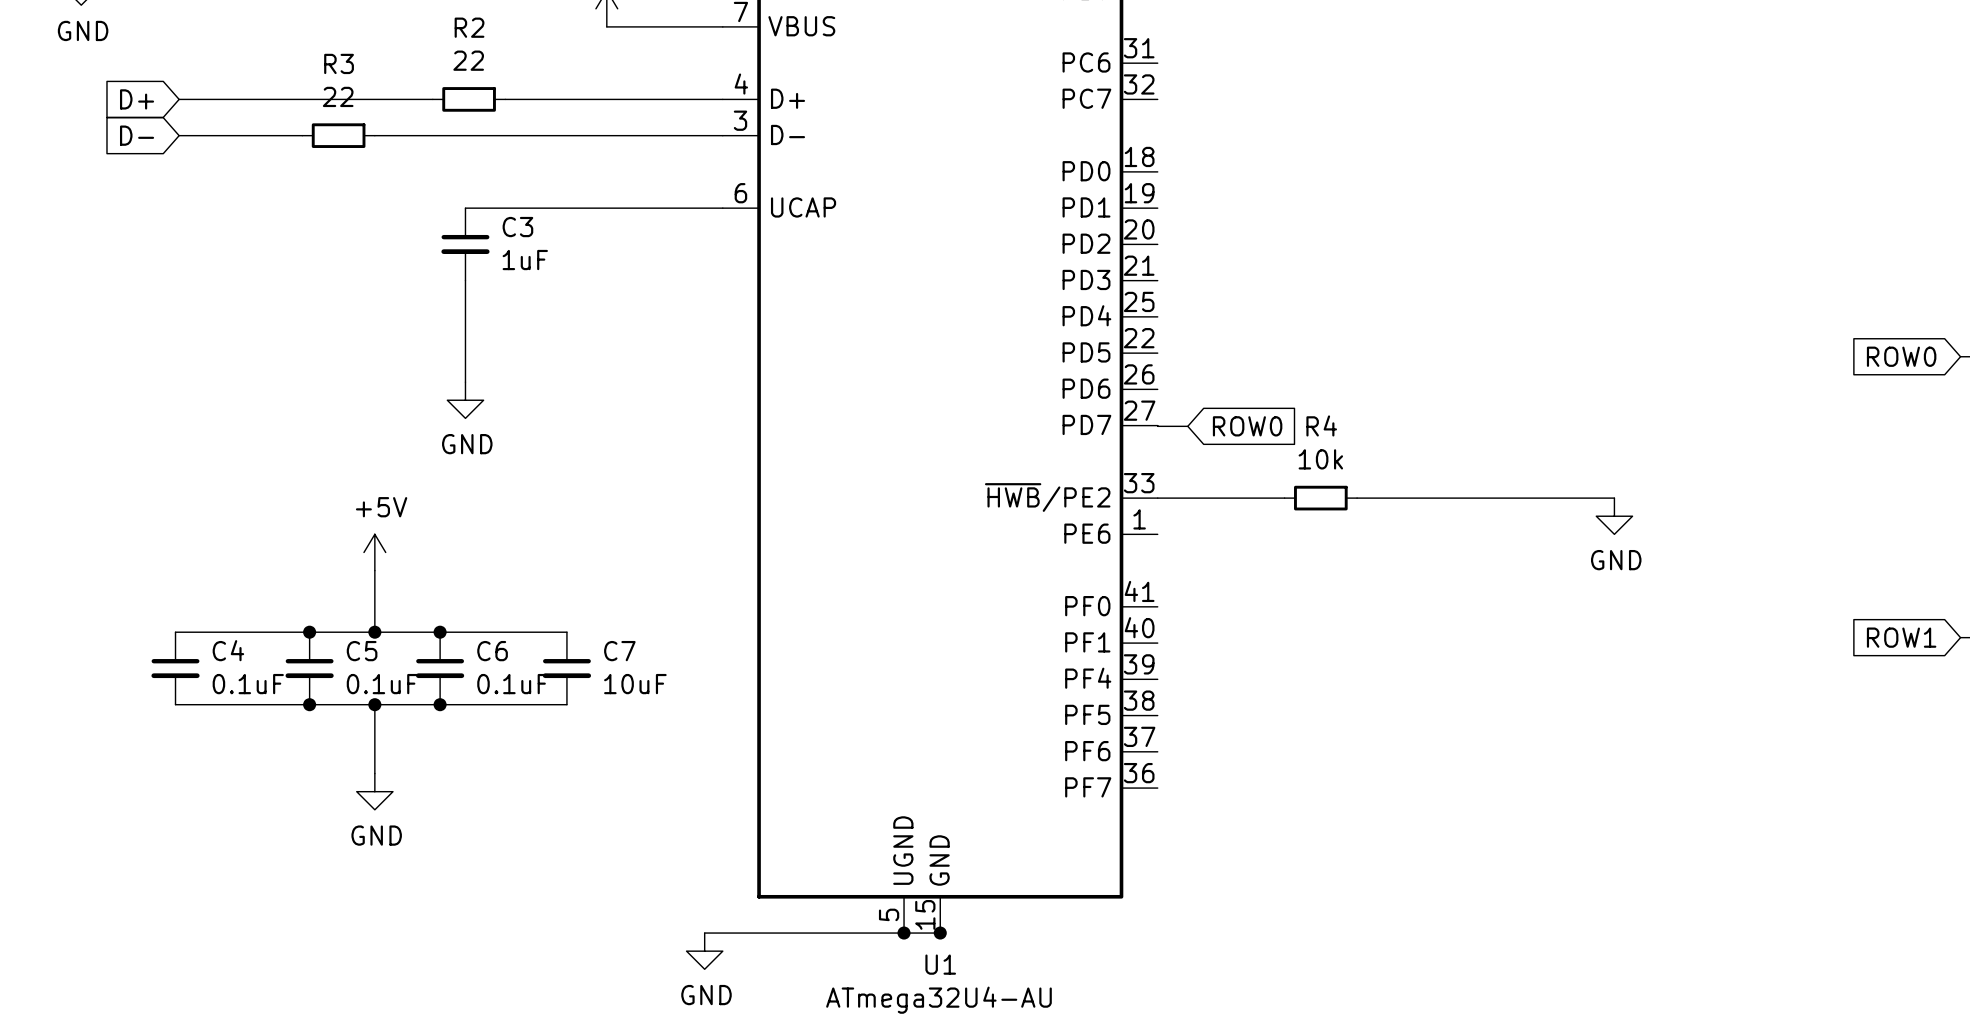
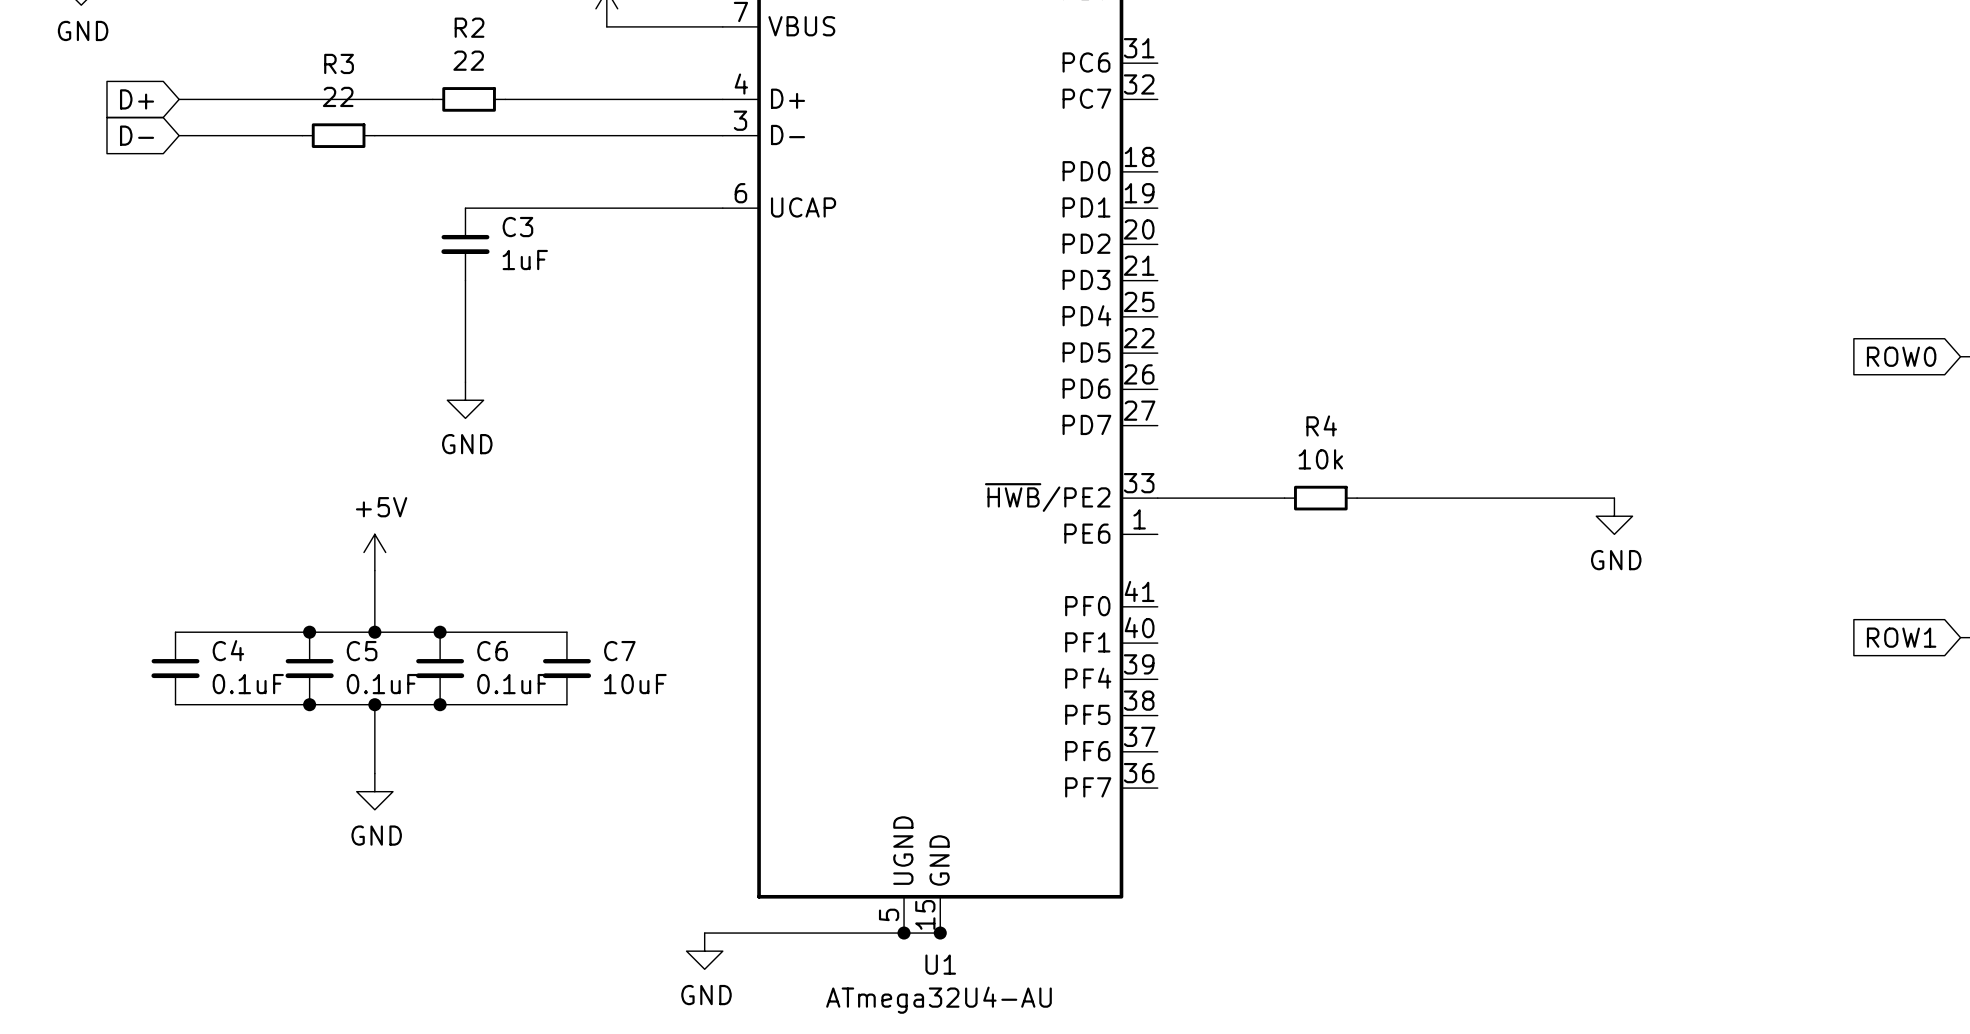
wire: (1157, 425) (1187, 426) -> none
global label: ROW0 (1247, 426) -> none

